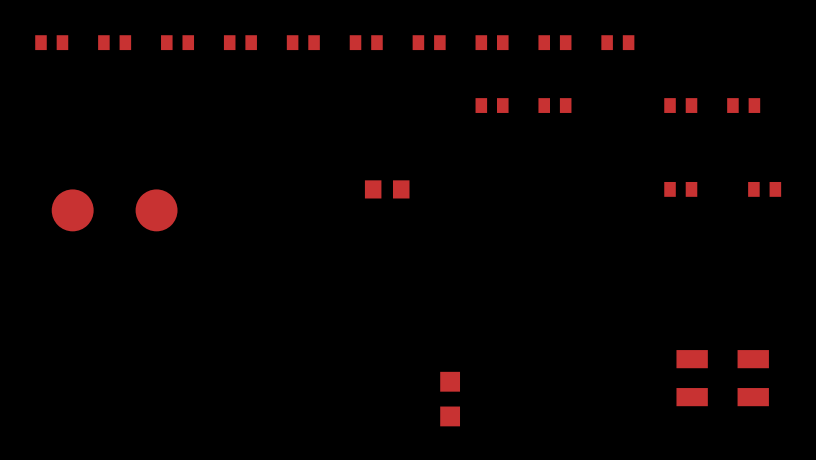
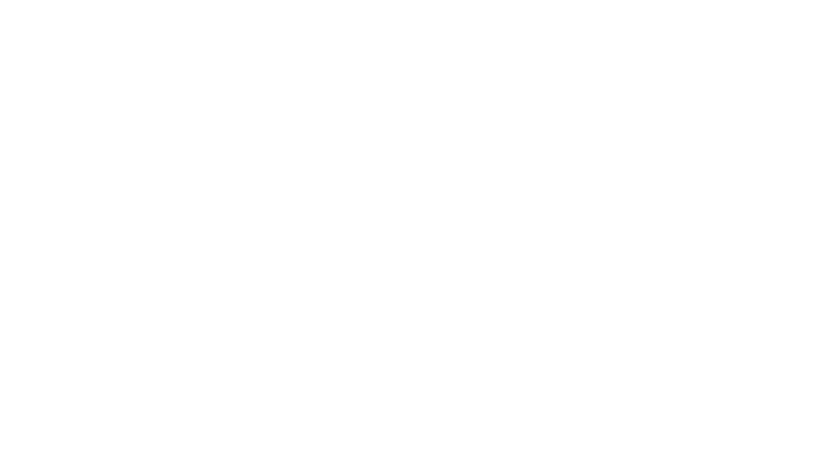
part: (51, 42) -> none
part: (114, 42) -> none
part: (177, 42) -> none
part: (240, 42) -> none
part: (303, 42) -> none
part: (366, 42) -> none
part: (429, 42) -> none
part: (492, 42) -> none
part: (554, 42) -> none
part: (617, 42) -> none
part: (492, 105) -> none
part: (554, 105) -> none
part: (680, 105) -> none
part: (743, 105) -> none
part: (387, 189) -> none
part: (680, 189) -> none
part: (764, 189) -> none
part: (72, 210) -> none
part: (156, 210) -> none
part: (722, 378) -> none
part: (450, 399) -> none

